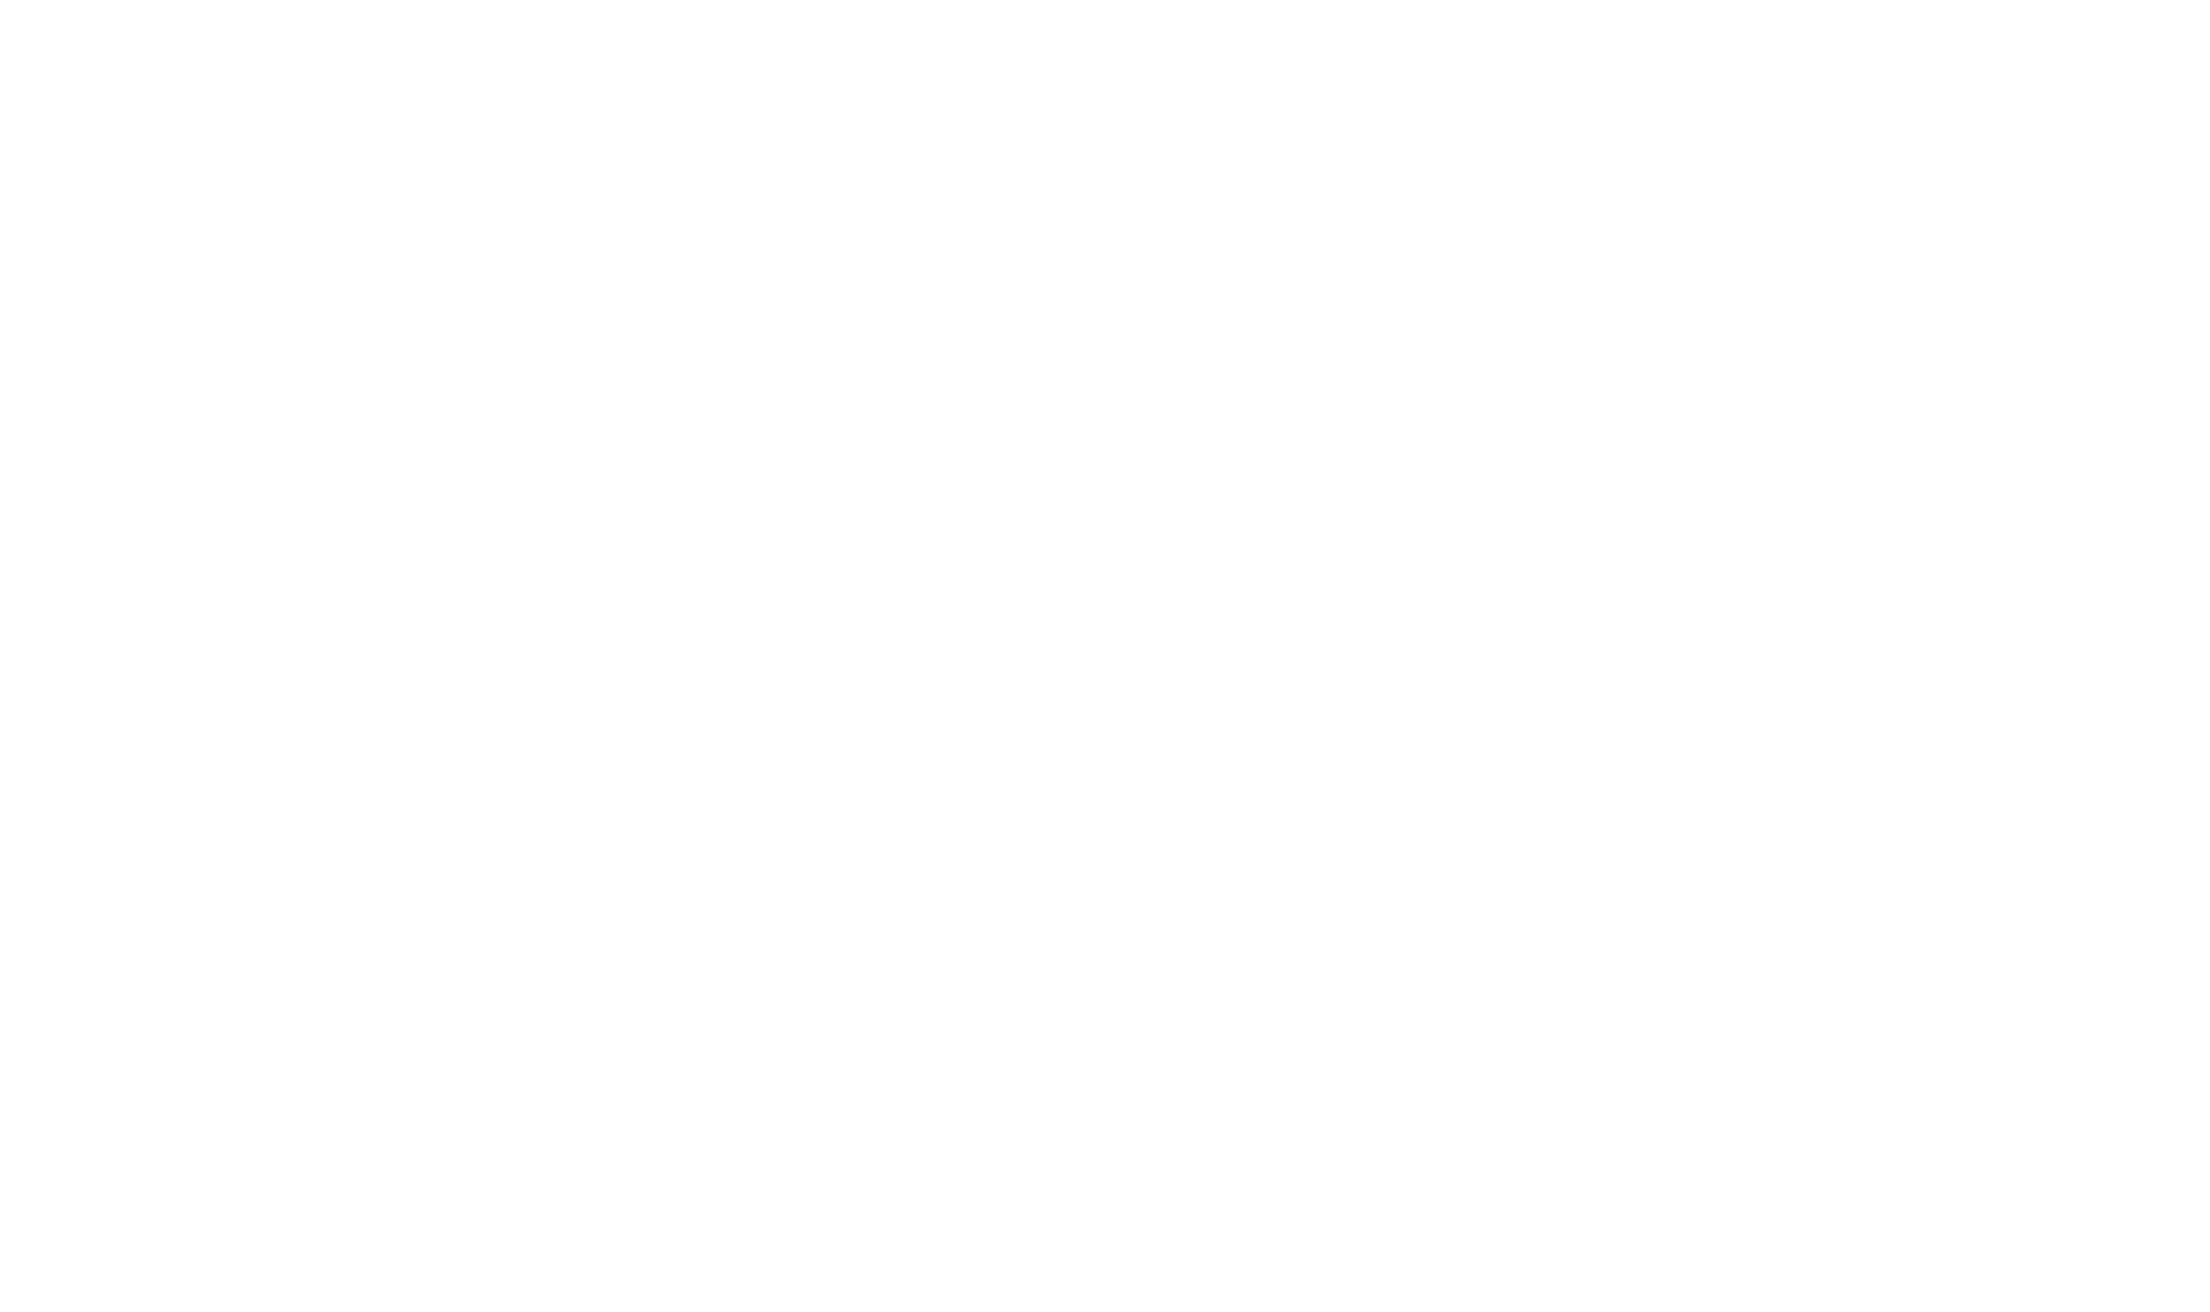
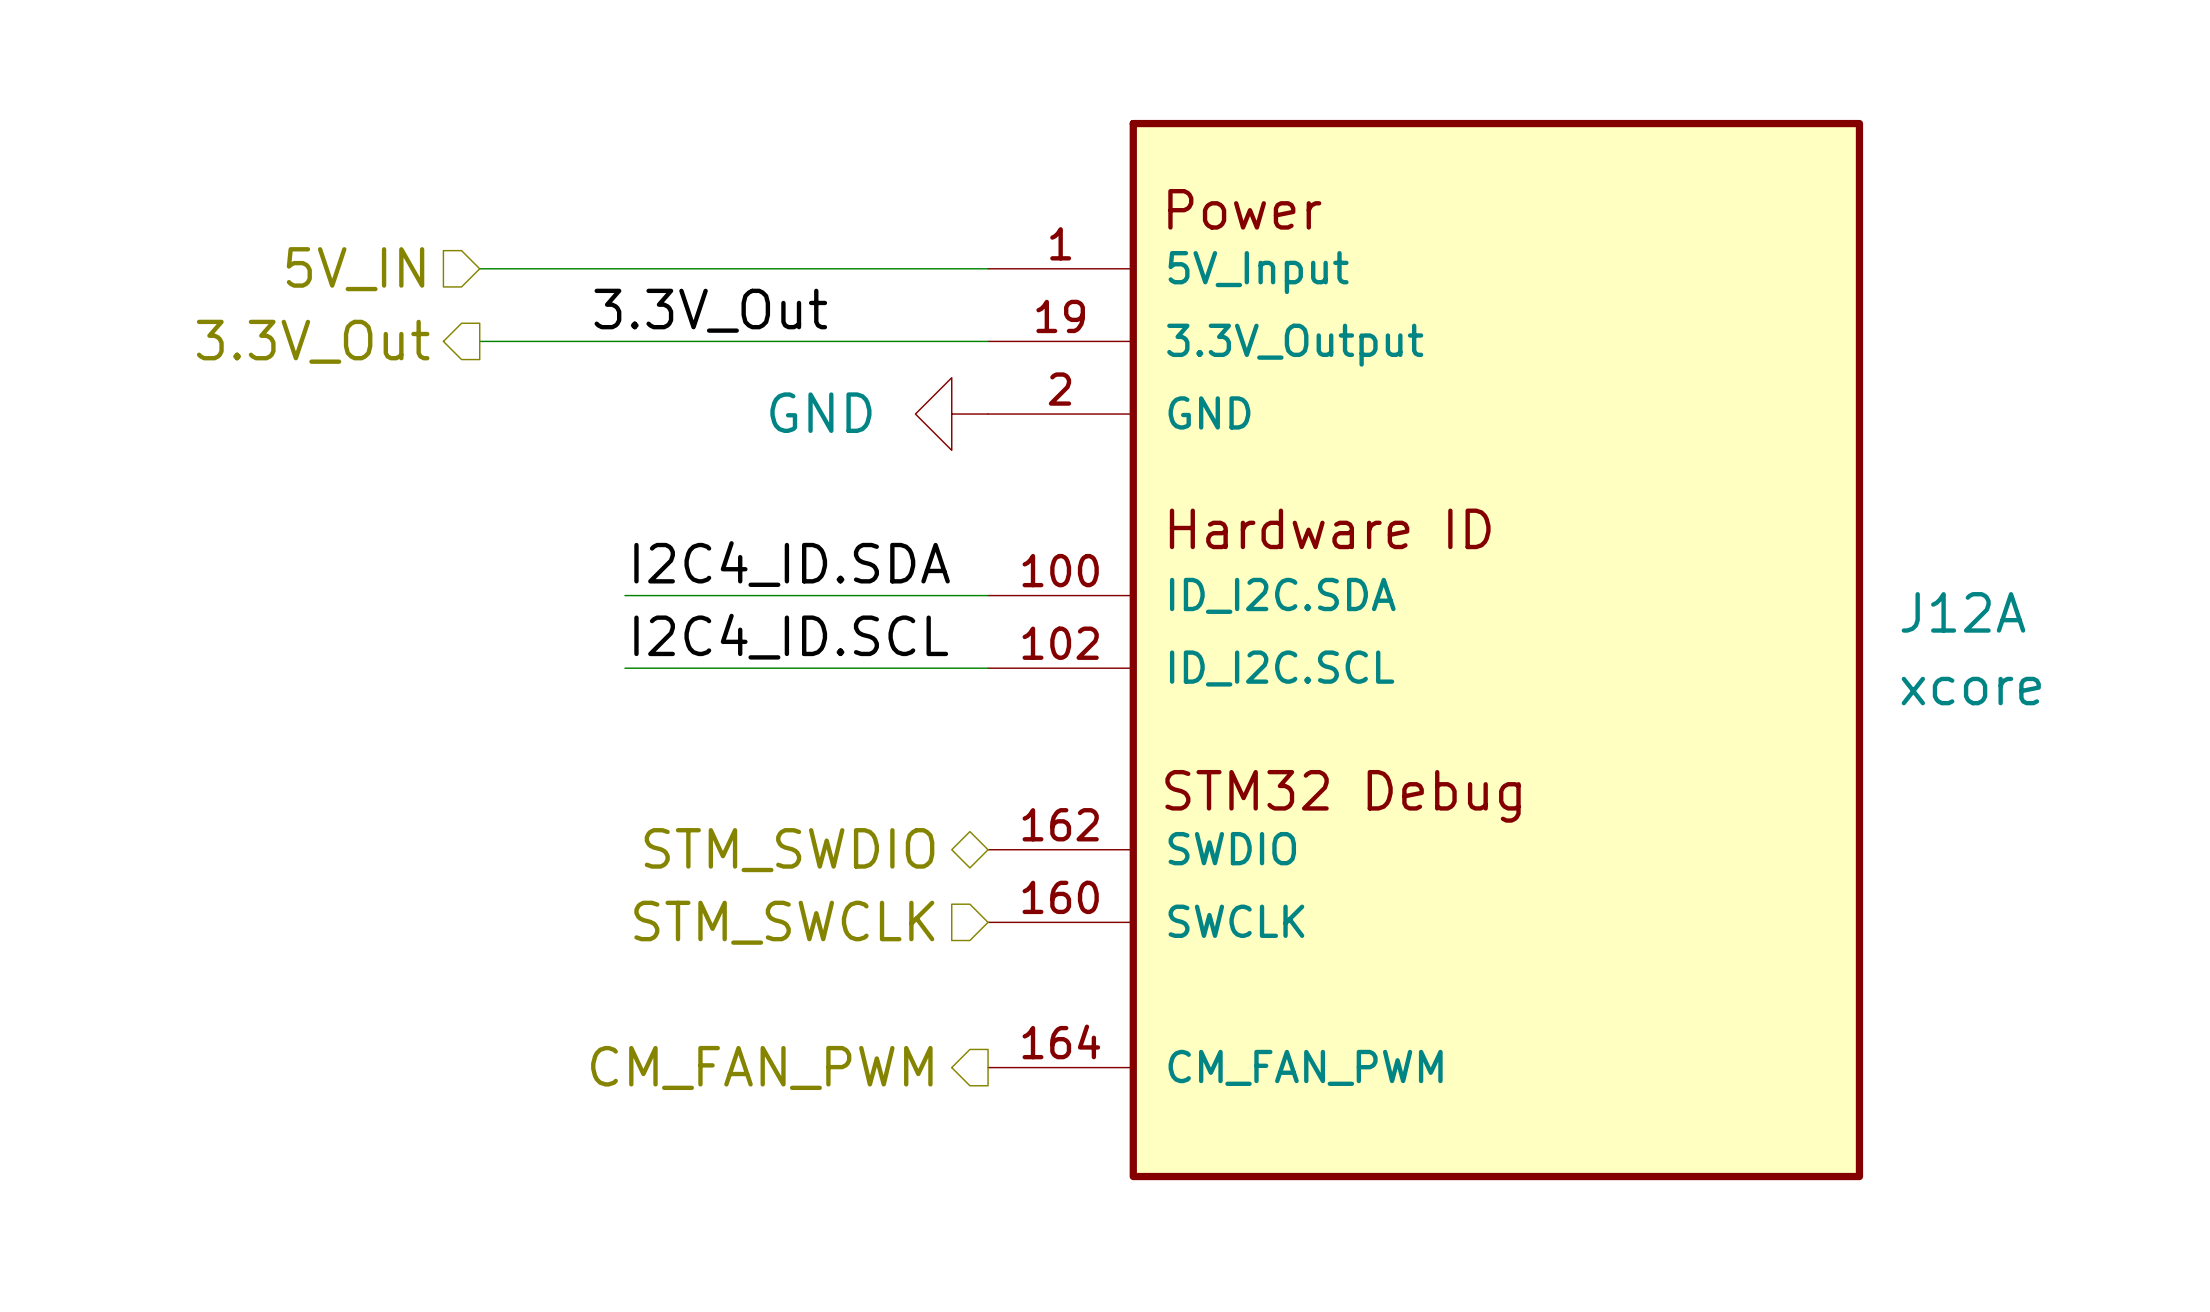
wire: none -> (479, 268) (988, 268)
hierarchical label: none -> 5V_IN (355, 269)
label: none -> 3.3V_Out (710, 310)
hierarchical label: none -> 3.3V_Out (313, 341)
wire: none -> (479, 341) (988, 341)
power symbol: none -> GND (951, 414)
label: none -> I2C4_ID.SDA (792, 564)
wire: none -> (624, 595) (988, 595)
label: none -> I2C4_ID.SCL (791, 636)
J12A: none -> xcore (1425, 650)
wire: none -> (624, 668) (988, 668)
hierarchical label: none -> STM_SWDIO (789, 850)
hierarchical label: none -> STM_SWCLK (784, 922)
hierarchical label: none -> CM_FAN_PWM (761, 1067)

